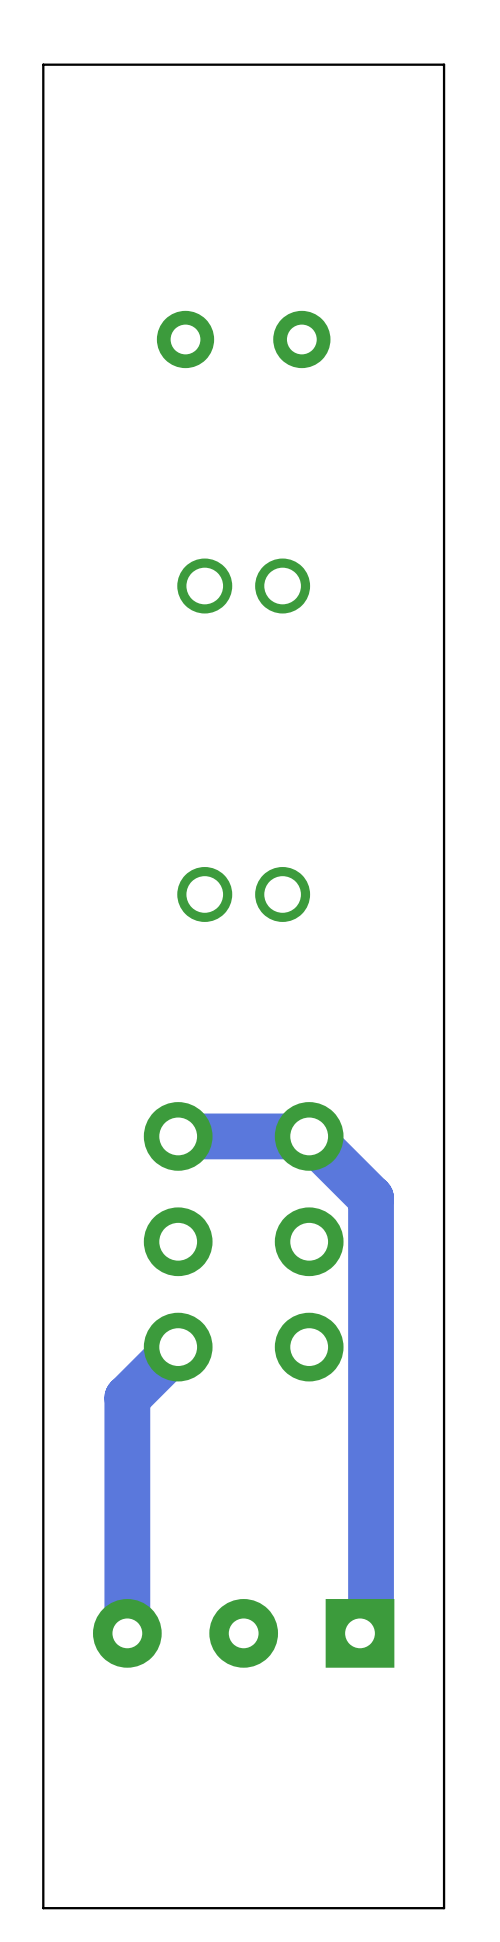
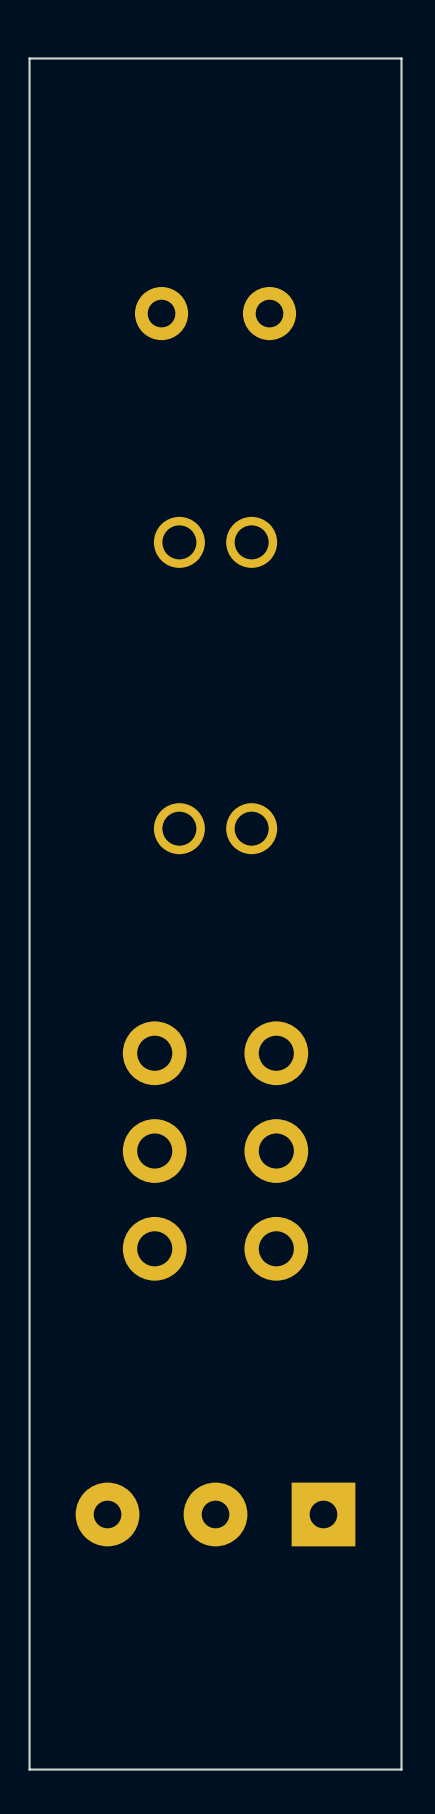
track: (178, 1136) (309, 1136) (371, 1198) (371, 1622) (360, 1633) -> none
track: (178, 1347) (127, 1397) (127, 1633) -> none

